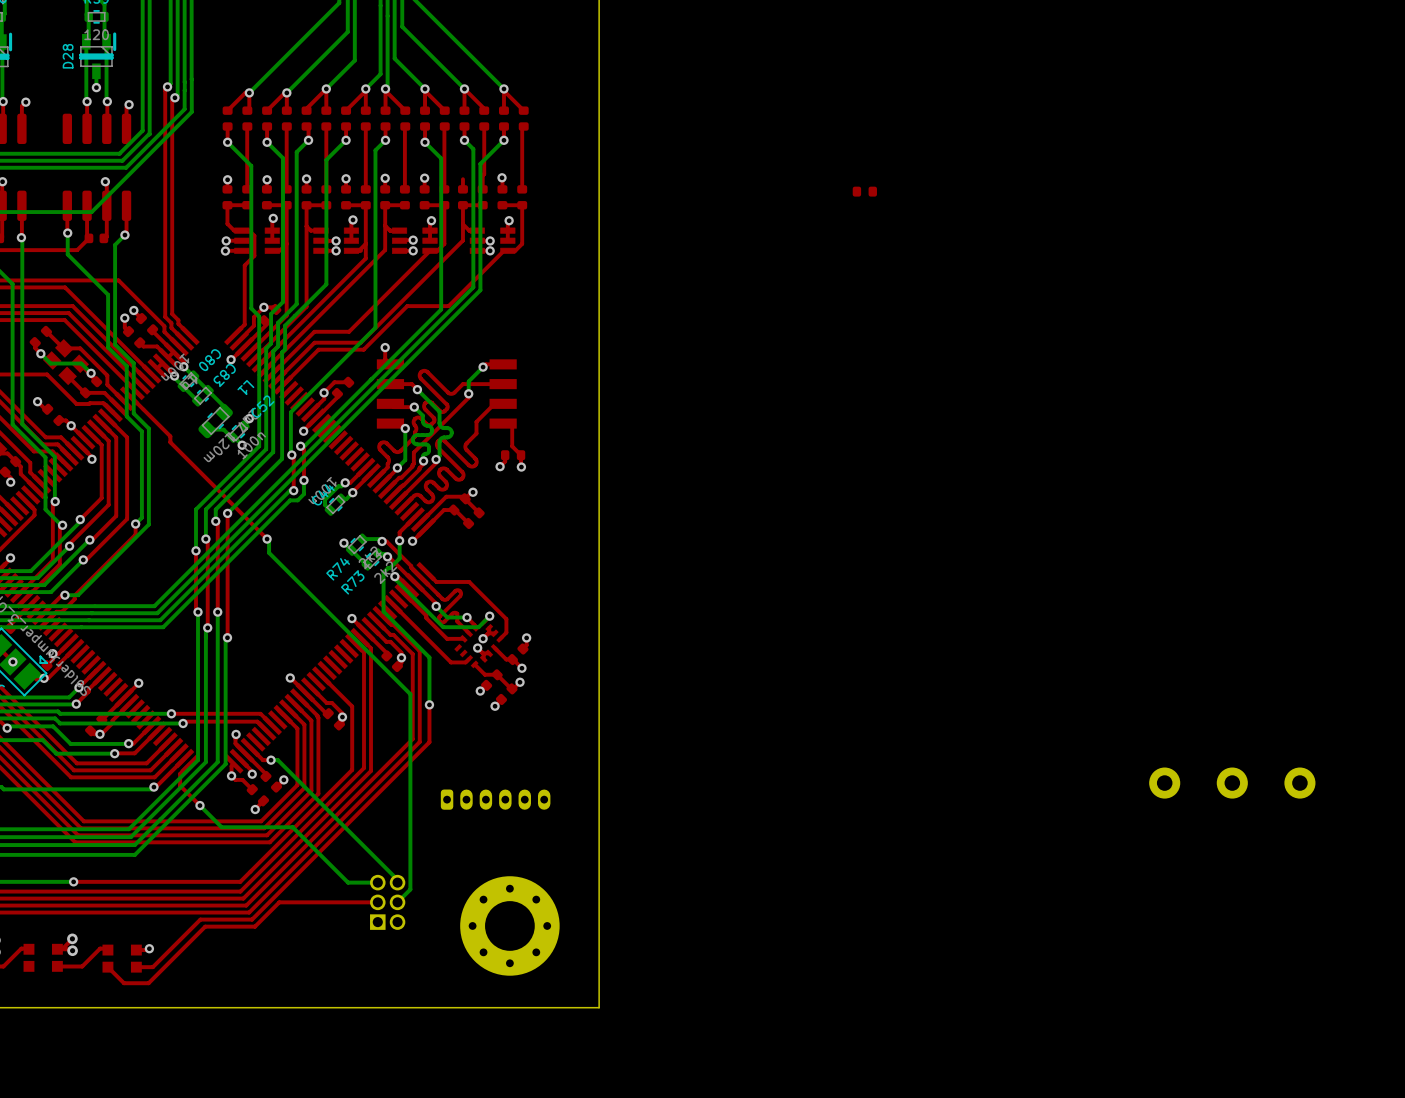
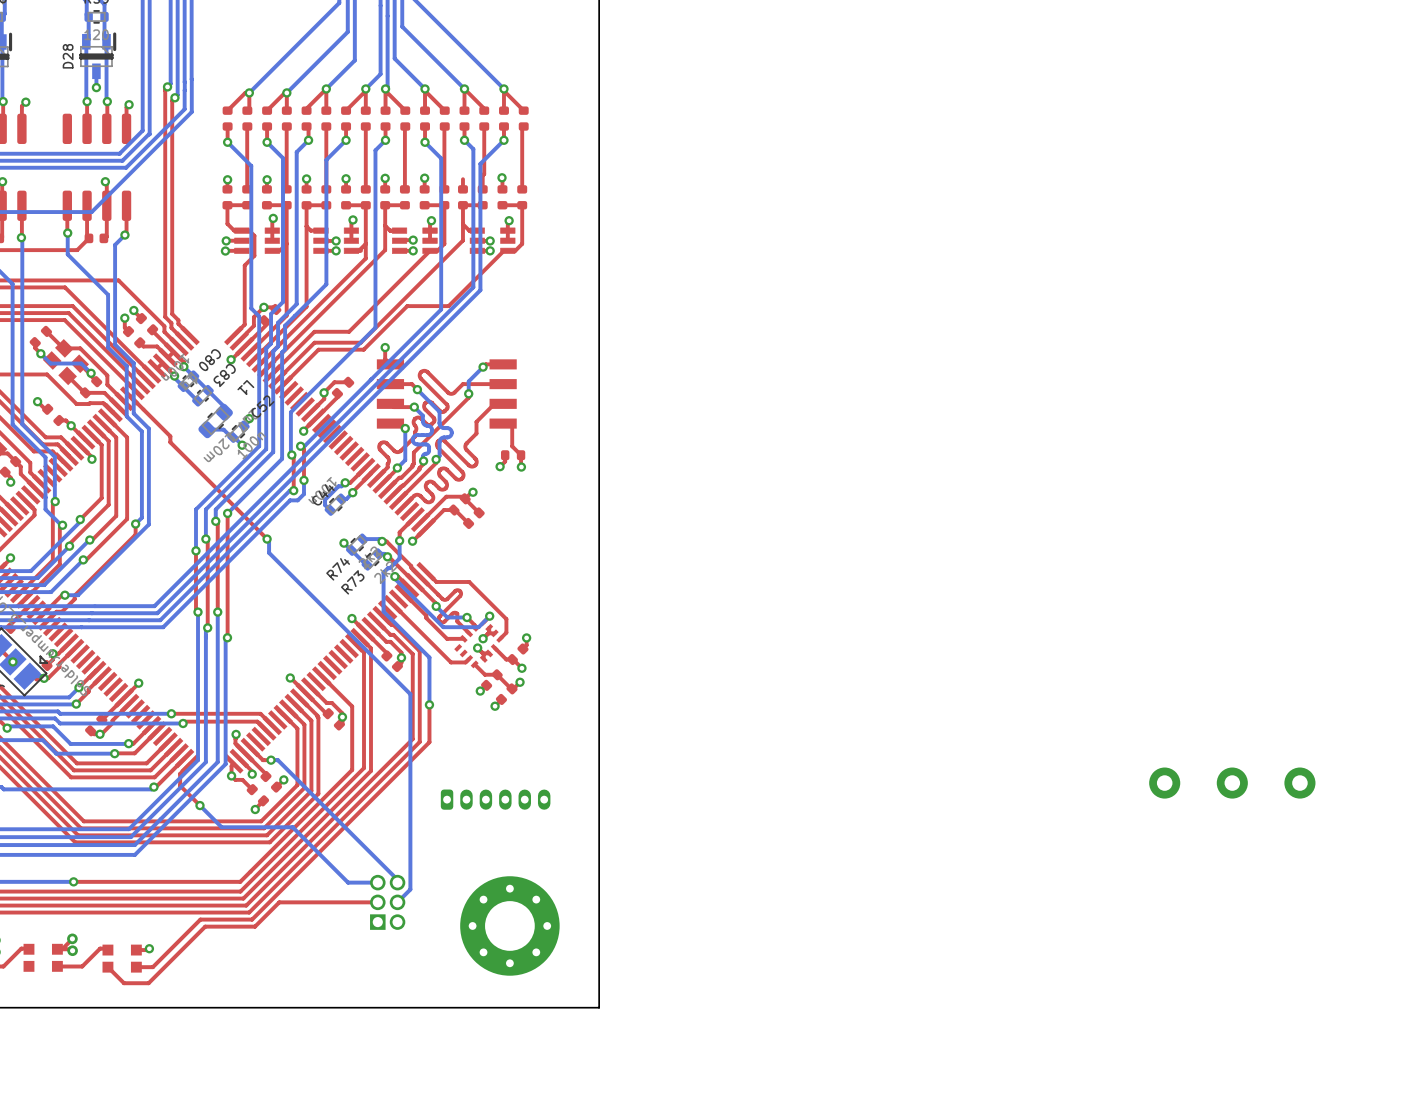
part: (864, 191) -> none

